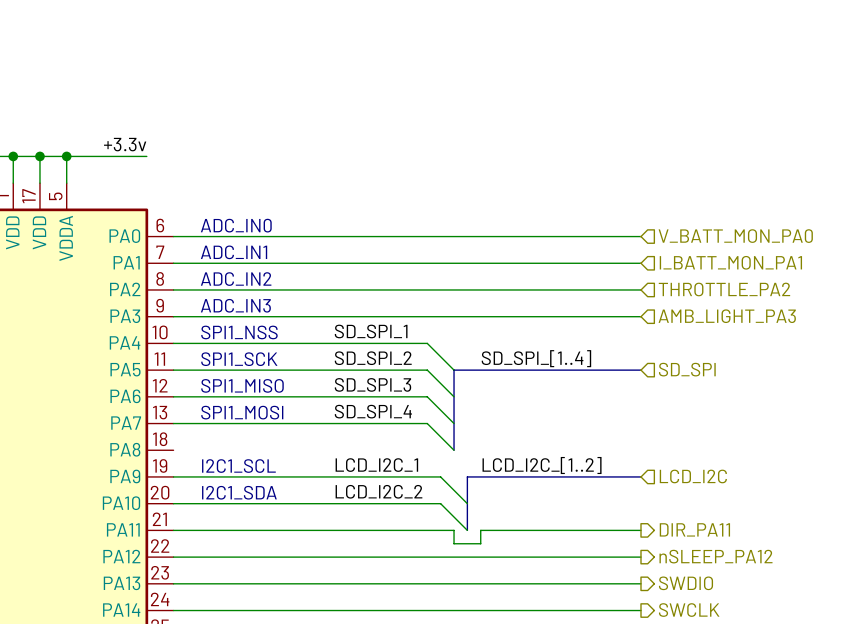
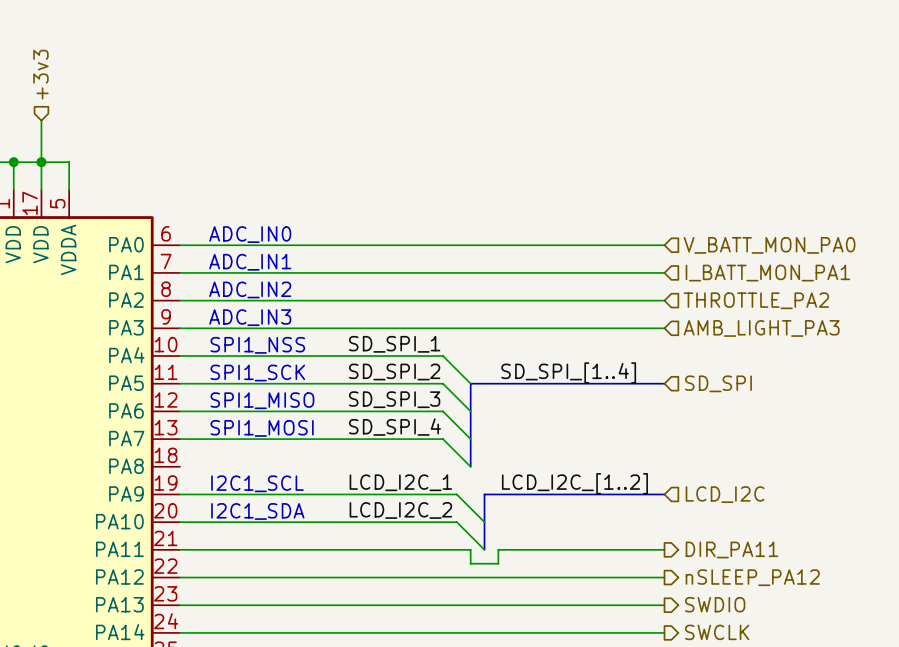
hierarchical label: none -> +3v3 (40, 74)
wire: none -> (41, 120) (41, 162)
label: +3.3v (125, 144) -> none
wire: (66, 156) (146, 156) -> none
junction: (66, 156) -> none

